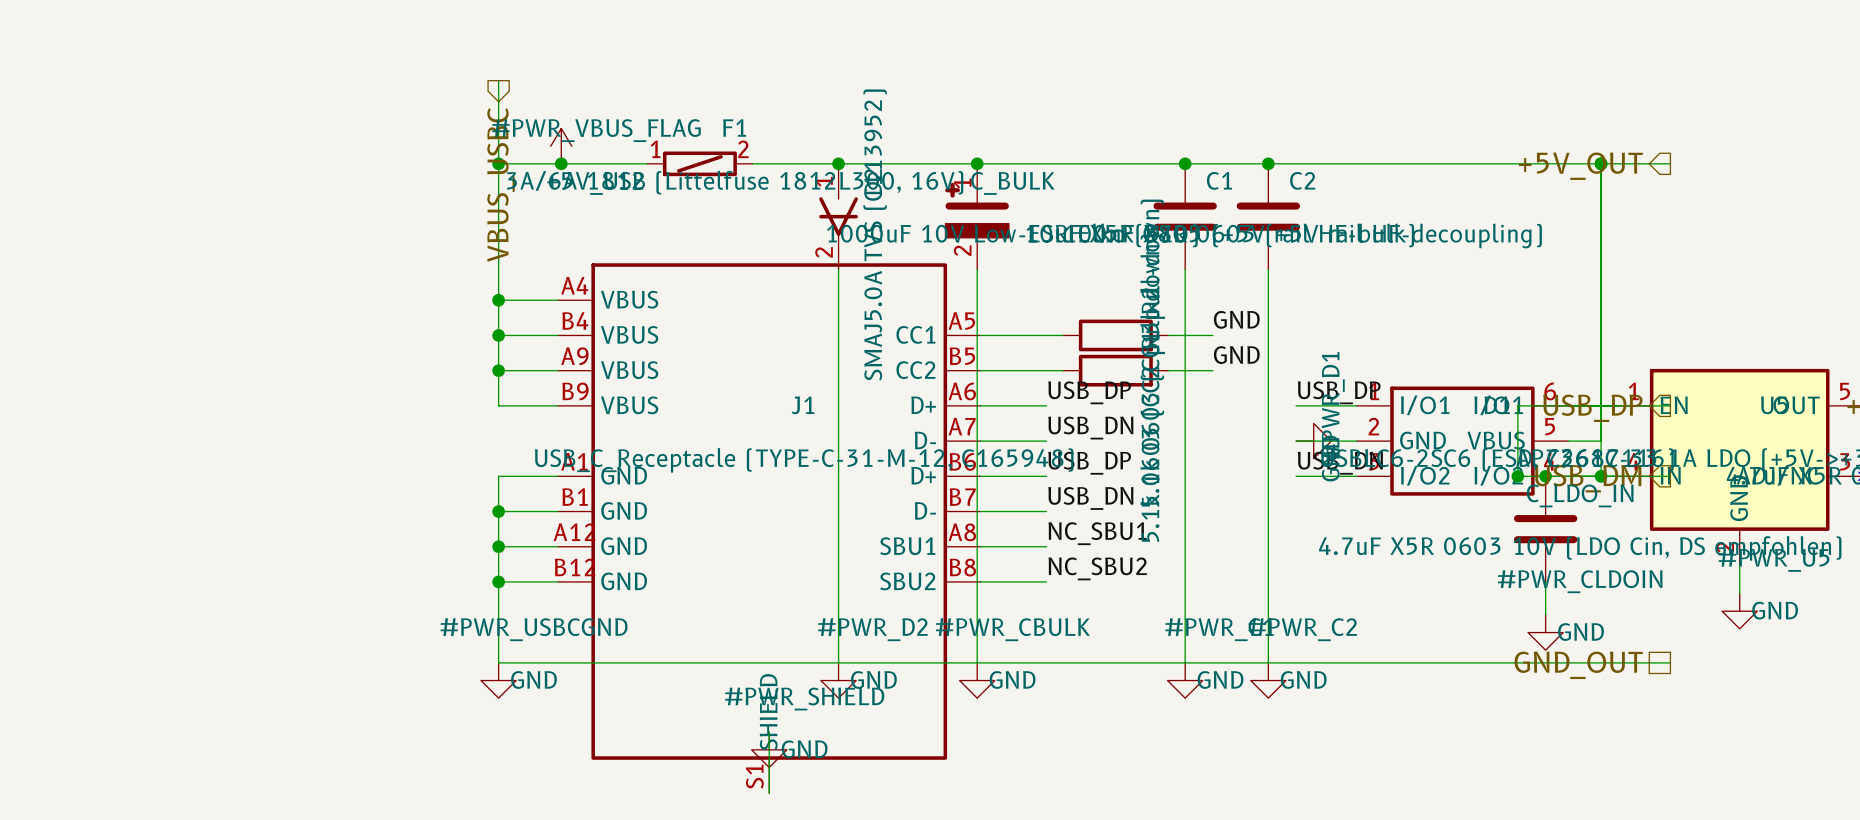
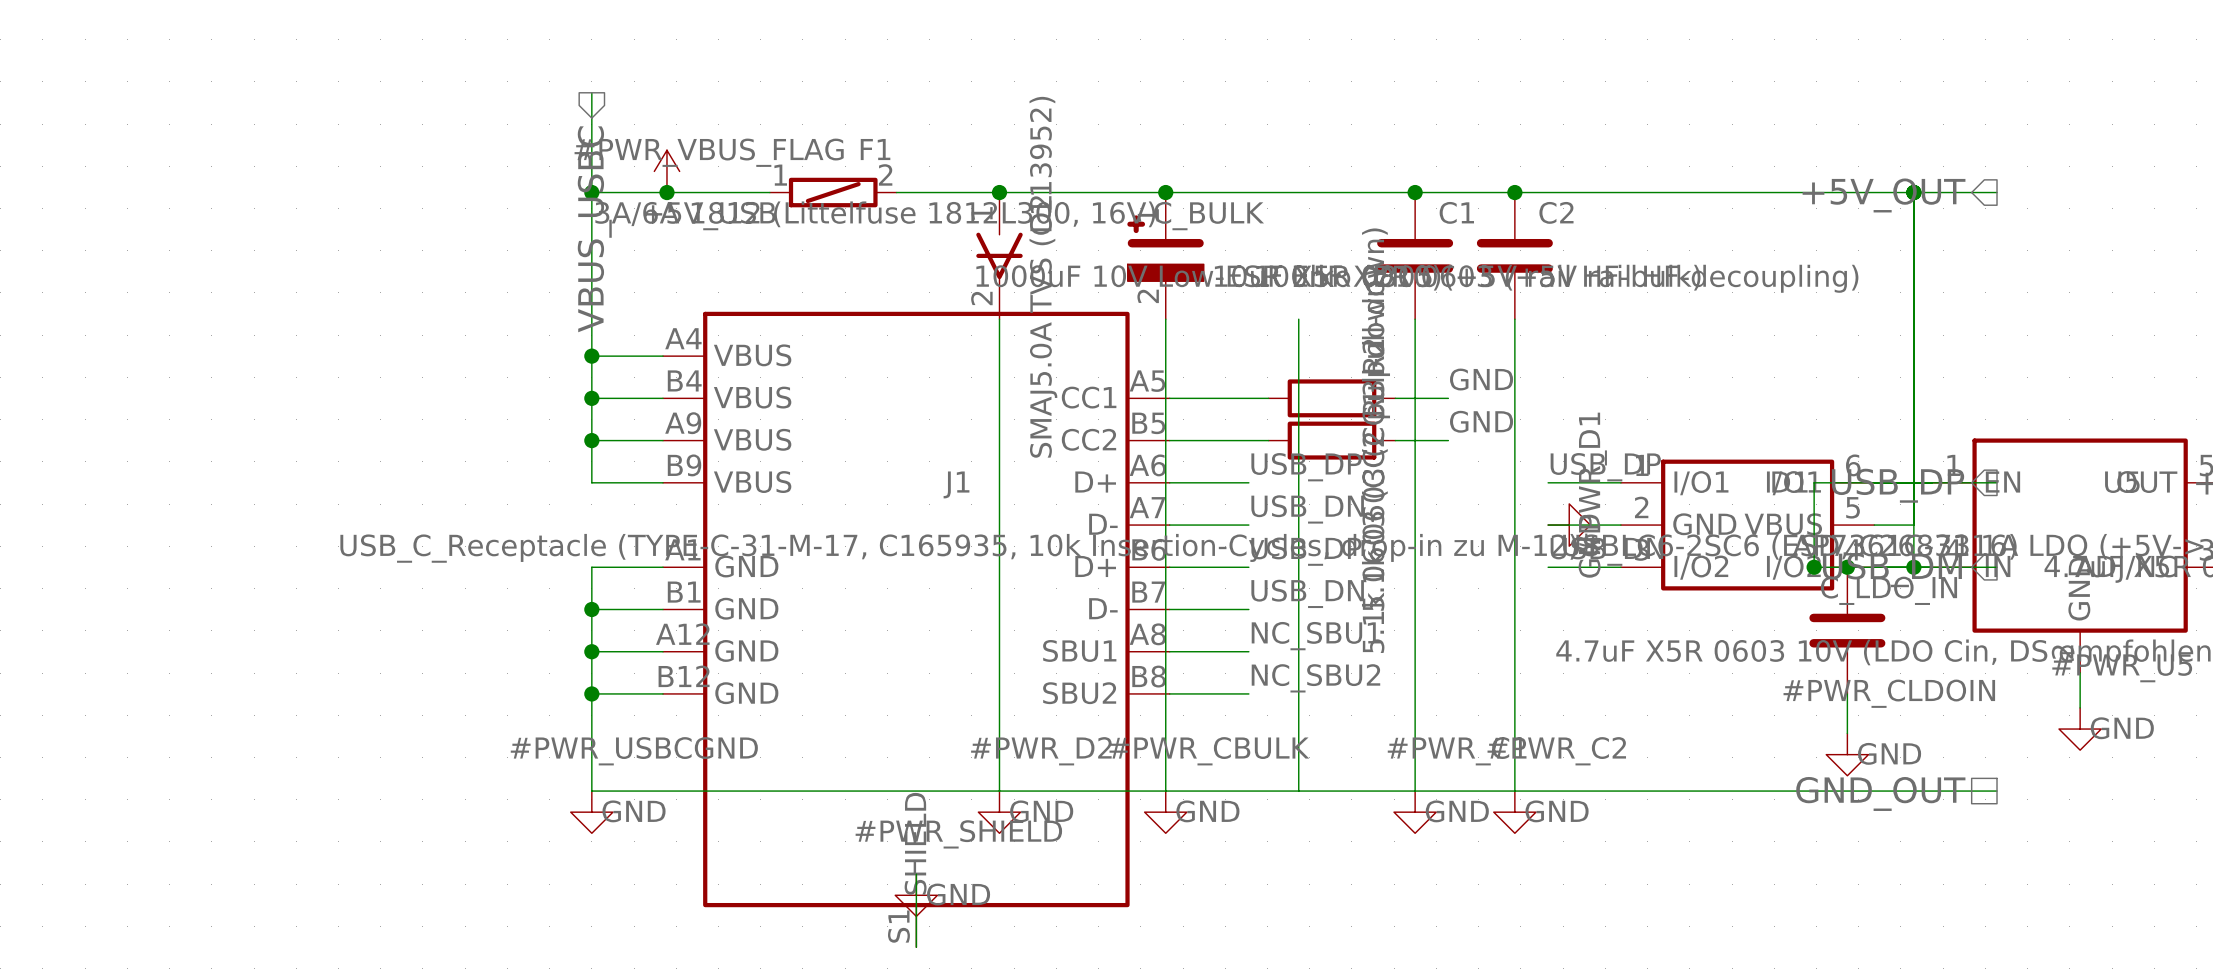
wire: none -> (1298, 319) (1298, 791)
J1 value: USB_C_Receptacle (TYPE-C-31-M-12, C165948) (804, 460) -> USB_C_Receptacle (TYPE-C-31-M-17, C165935, 10k Insertion-Cycles, drop-in zu M-12) (958, 548)

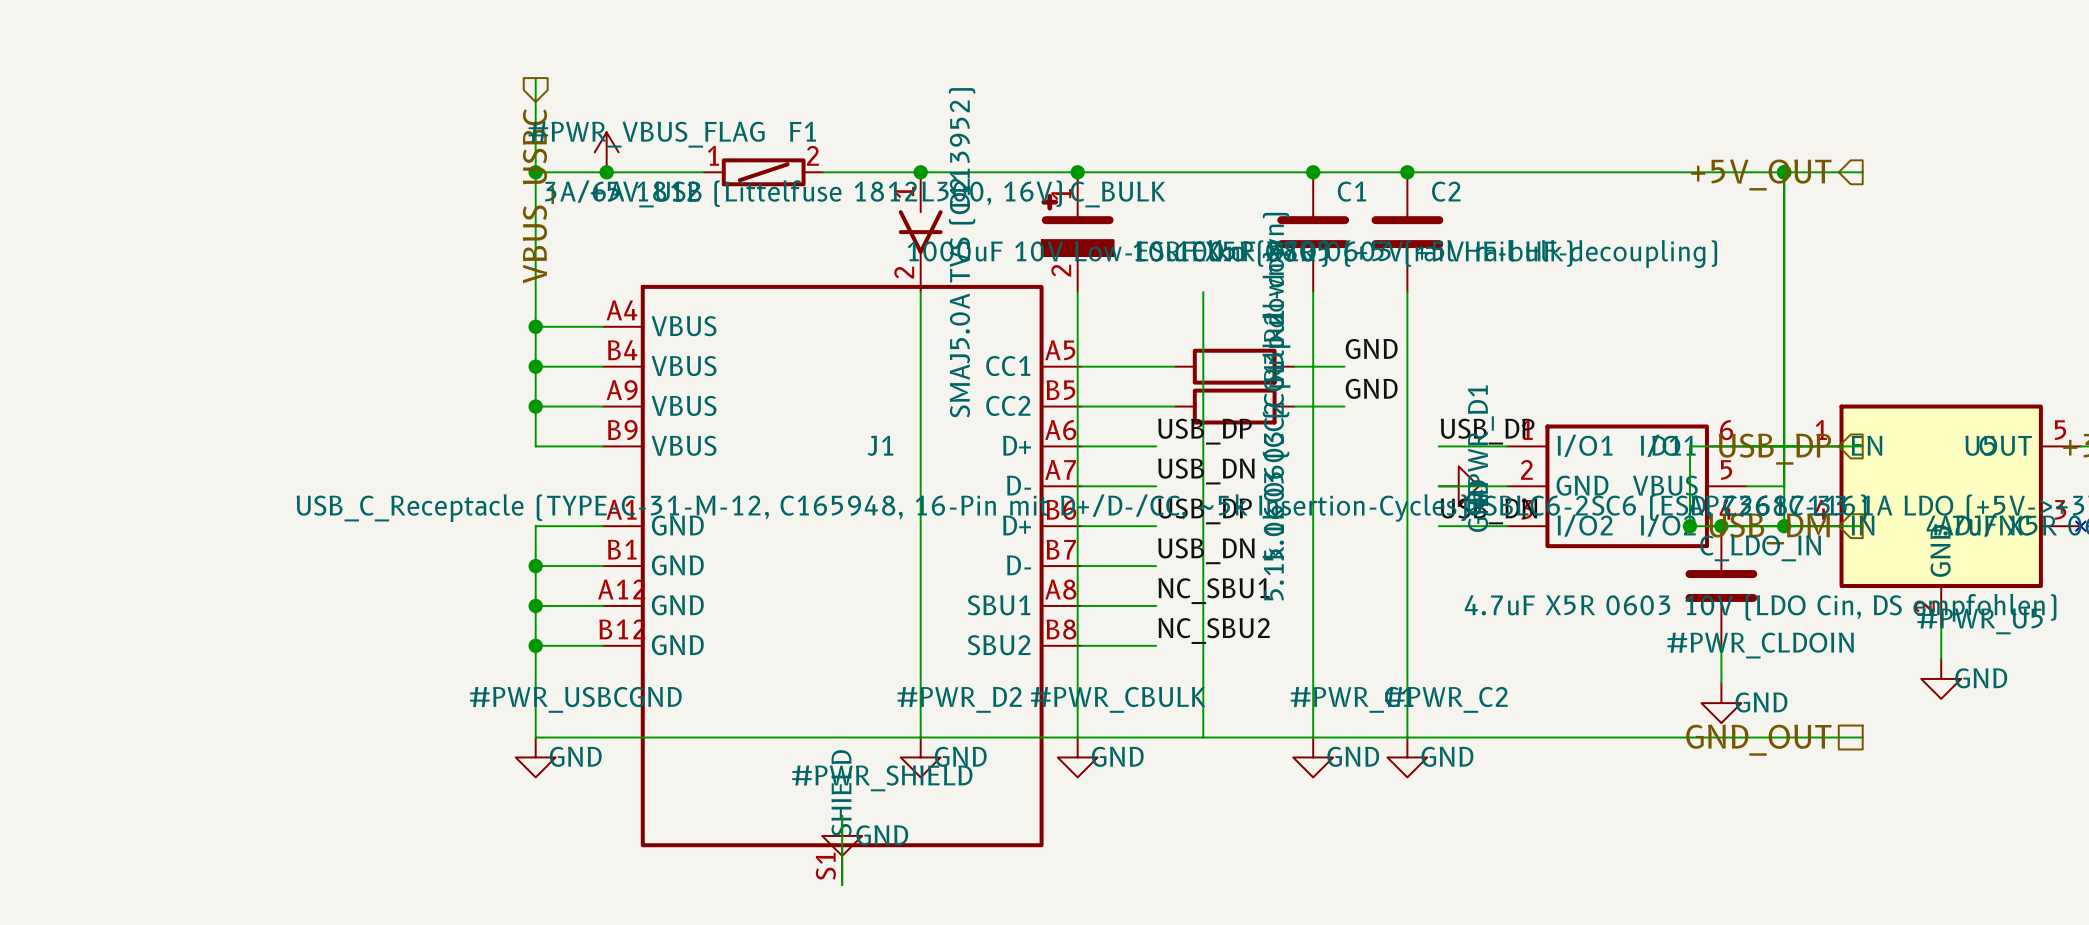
J1 value: USB_C_Receptacle (TYPE-C-31-M-17, C165935, 10k Insertion-Cycles, drop-in zu M-12) (958, 548) -> USB_C_Receptacle (TYPE-C-31-M-12, C165948, 16-Pin mit D+/D-/CC, ~5k Insertion-Cycles) (881, 508)

